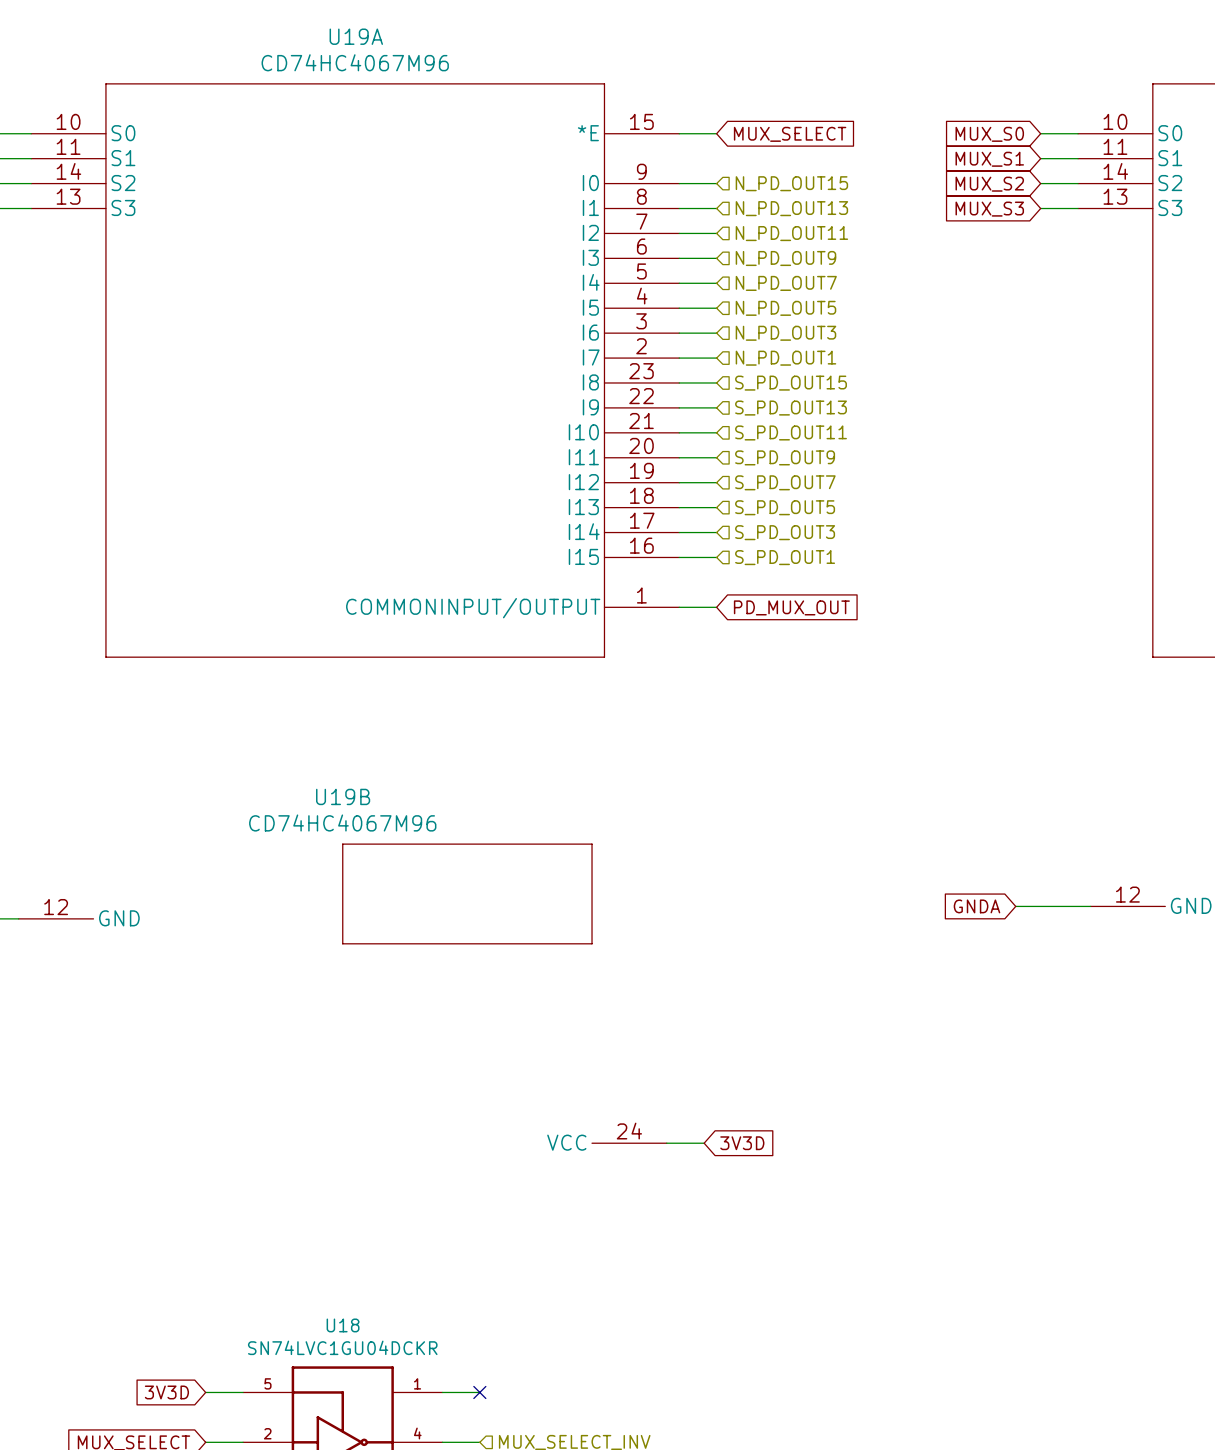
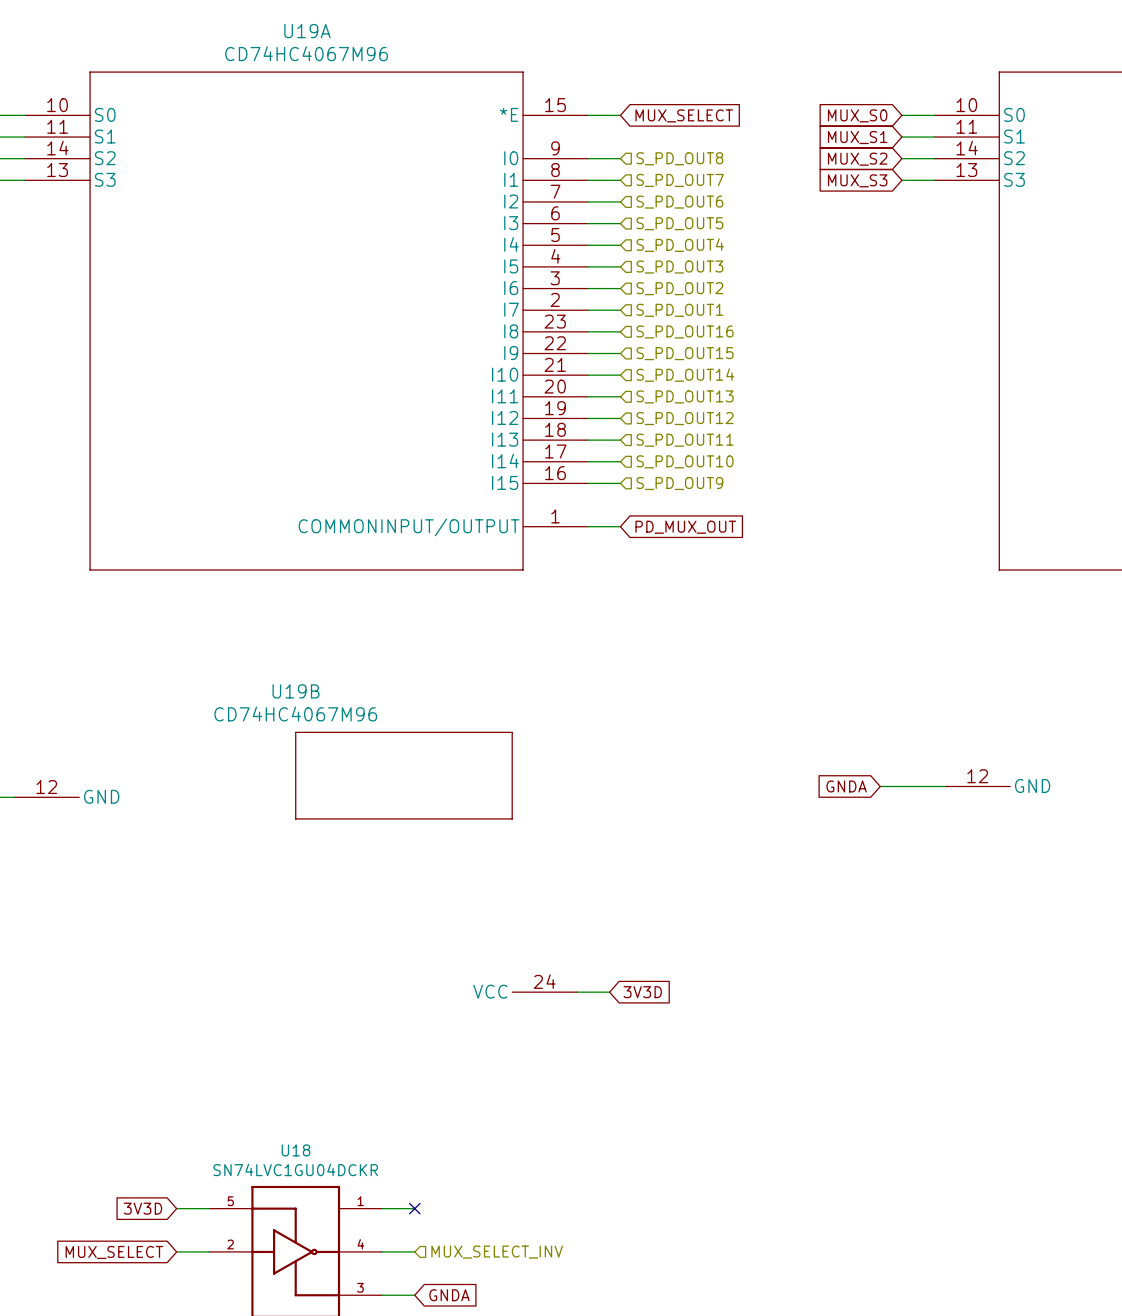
hierarchical label: N_PD_OUT15 (791, 183) -> S_PD_OUT8 (679, 158)
hierarchical label: N_PD_OUT13 (791, 208) -> S_PD_OUT7 (680, 180)
hierarchical label: N_PD_OUT11 (791, 233) -> S_PD_OUT6 (679, 202)
hierarchical label: N_PD_OUT9 (785, 258) -> S_PD_OUT5 (679, 223)
hierarchical label: N_PD_OUT7 (786, 283) -> S_PD_OUT4 (680, 245)
hierarchical label: N_PD_OUT5 (785, 308) -> S_PD_OUT3 (679, 267)
hierarchical label: N_PD_OUT3 (785, 333) -> S_PD_OUT2 (679, 288)
hierarchical label: N_PD_OUT1 (785, 358) -> S_PD_OUT1 (679, 310)
hierarchical label: S_PD_OUT15 (791, 383) -> S_PD_OUT16 (685, 331)
hierarchical label: S_PD_OUT13 (791, 408) -> S_PD_OUT15 (685, 353)
hierarchical label: S_PD_OUT11 (791, 432) -> S_PD_OUT14 (685, 375)
hierarchical label: S_PD_OUT9 (785, 457) -> S_PD_OUT13 (685, 396)
hierarchical label: S_PD_OUT7 (785, 482) -> S_PD_OUT12 (685, 418)
hierarchical label: S_PD_OUT5 (785, 507) -> S_PD_OUT11 (685, 440)
hierarchical label: S_PD_OUT3 (785, 532) -> S_PD_OUT10 (685, 461)
hierarchical label: S_PD_OUT1 (785, 557) -> S_PD_OUT9 (679, 483)

